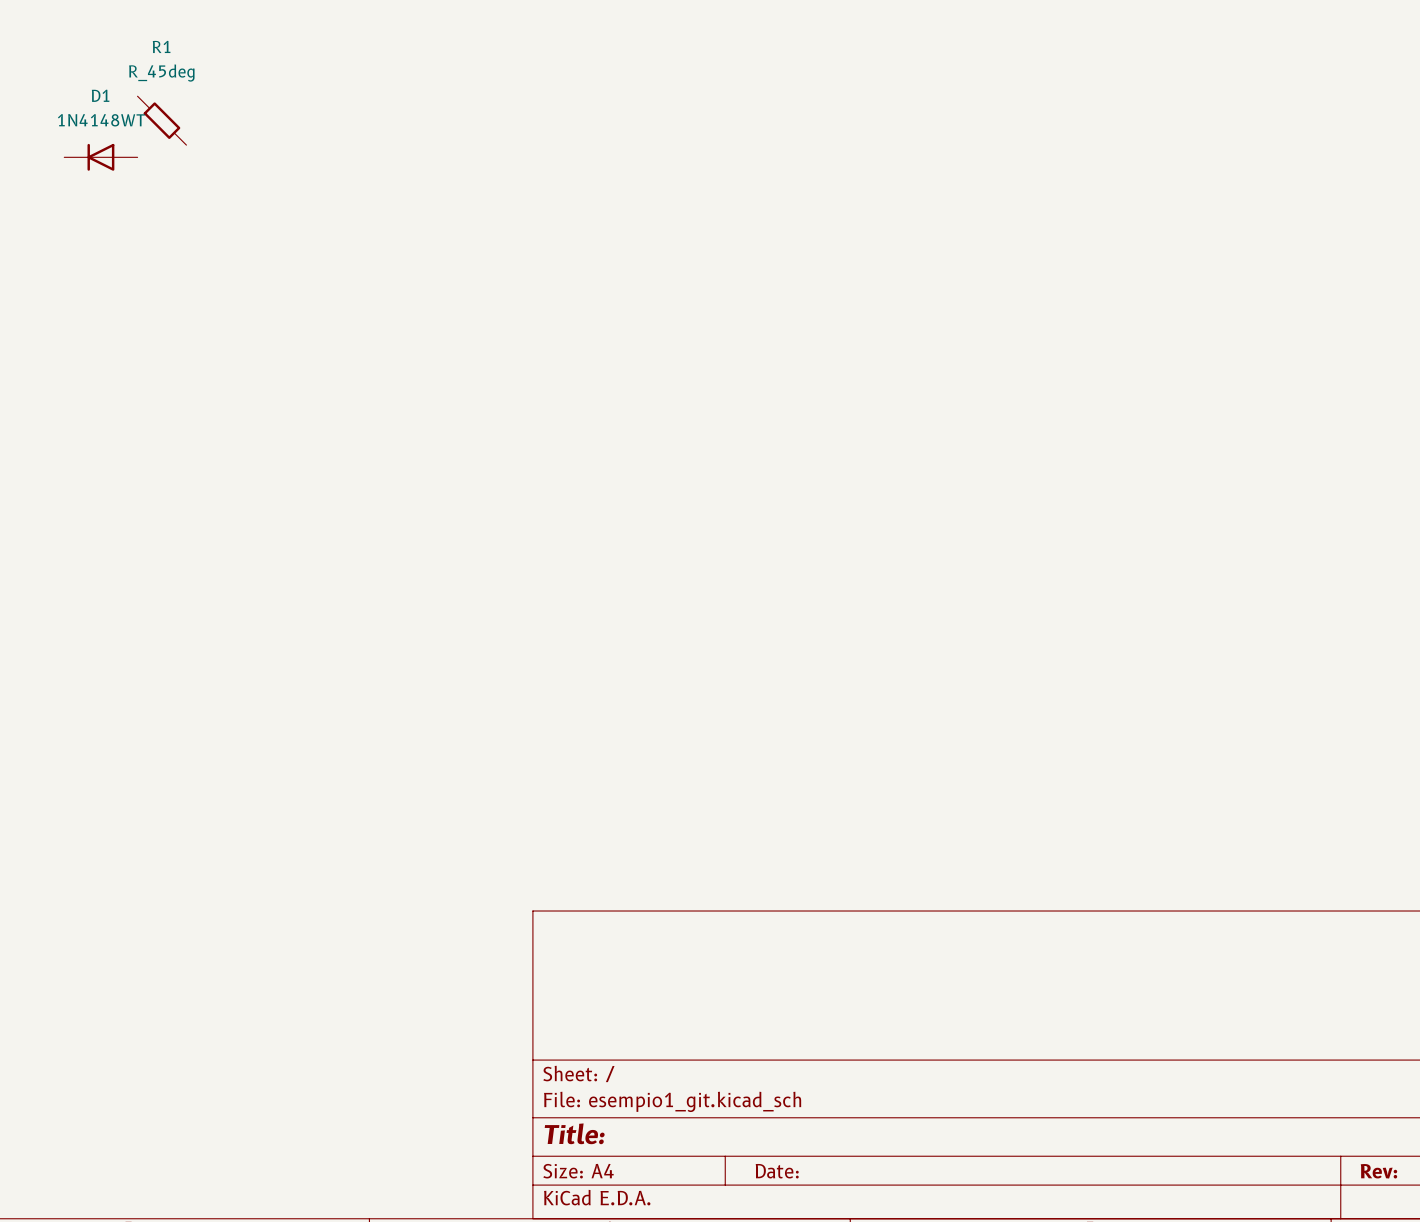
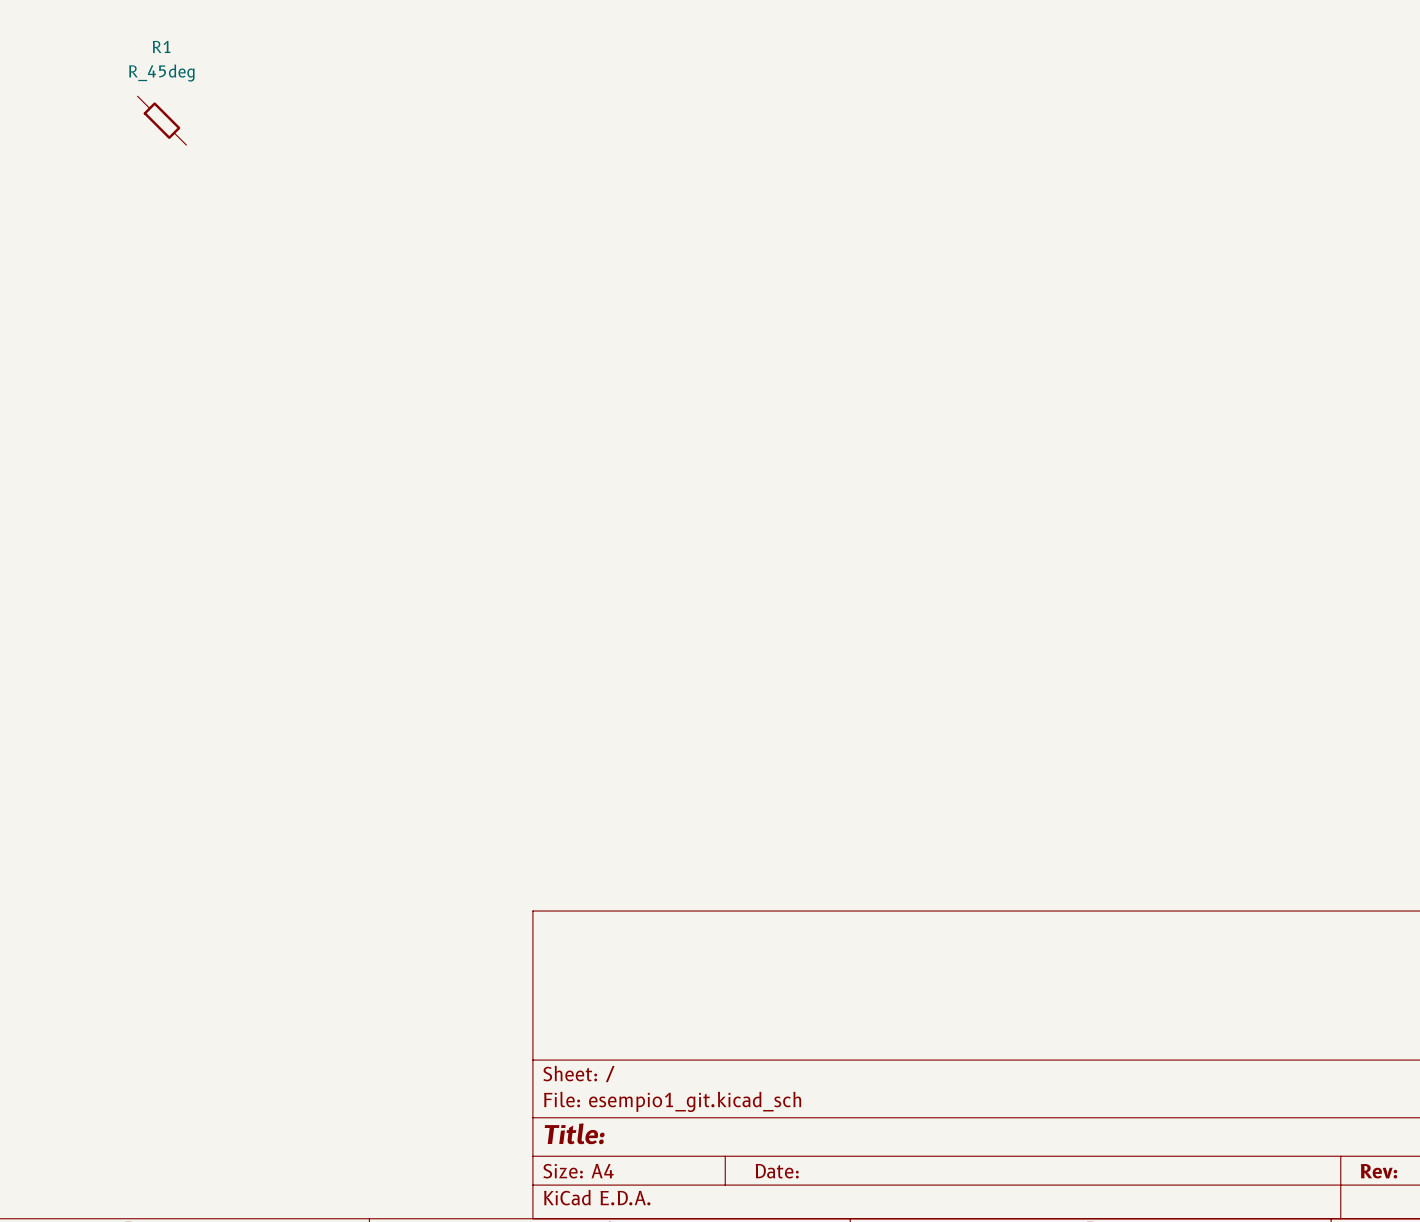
D1: 1N4148WT (100, 157) -> none

